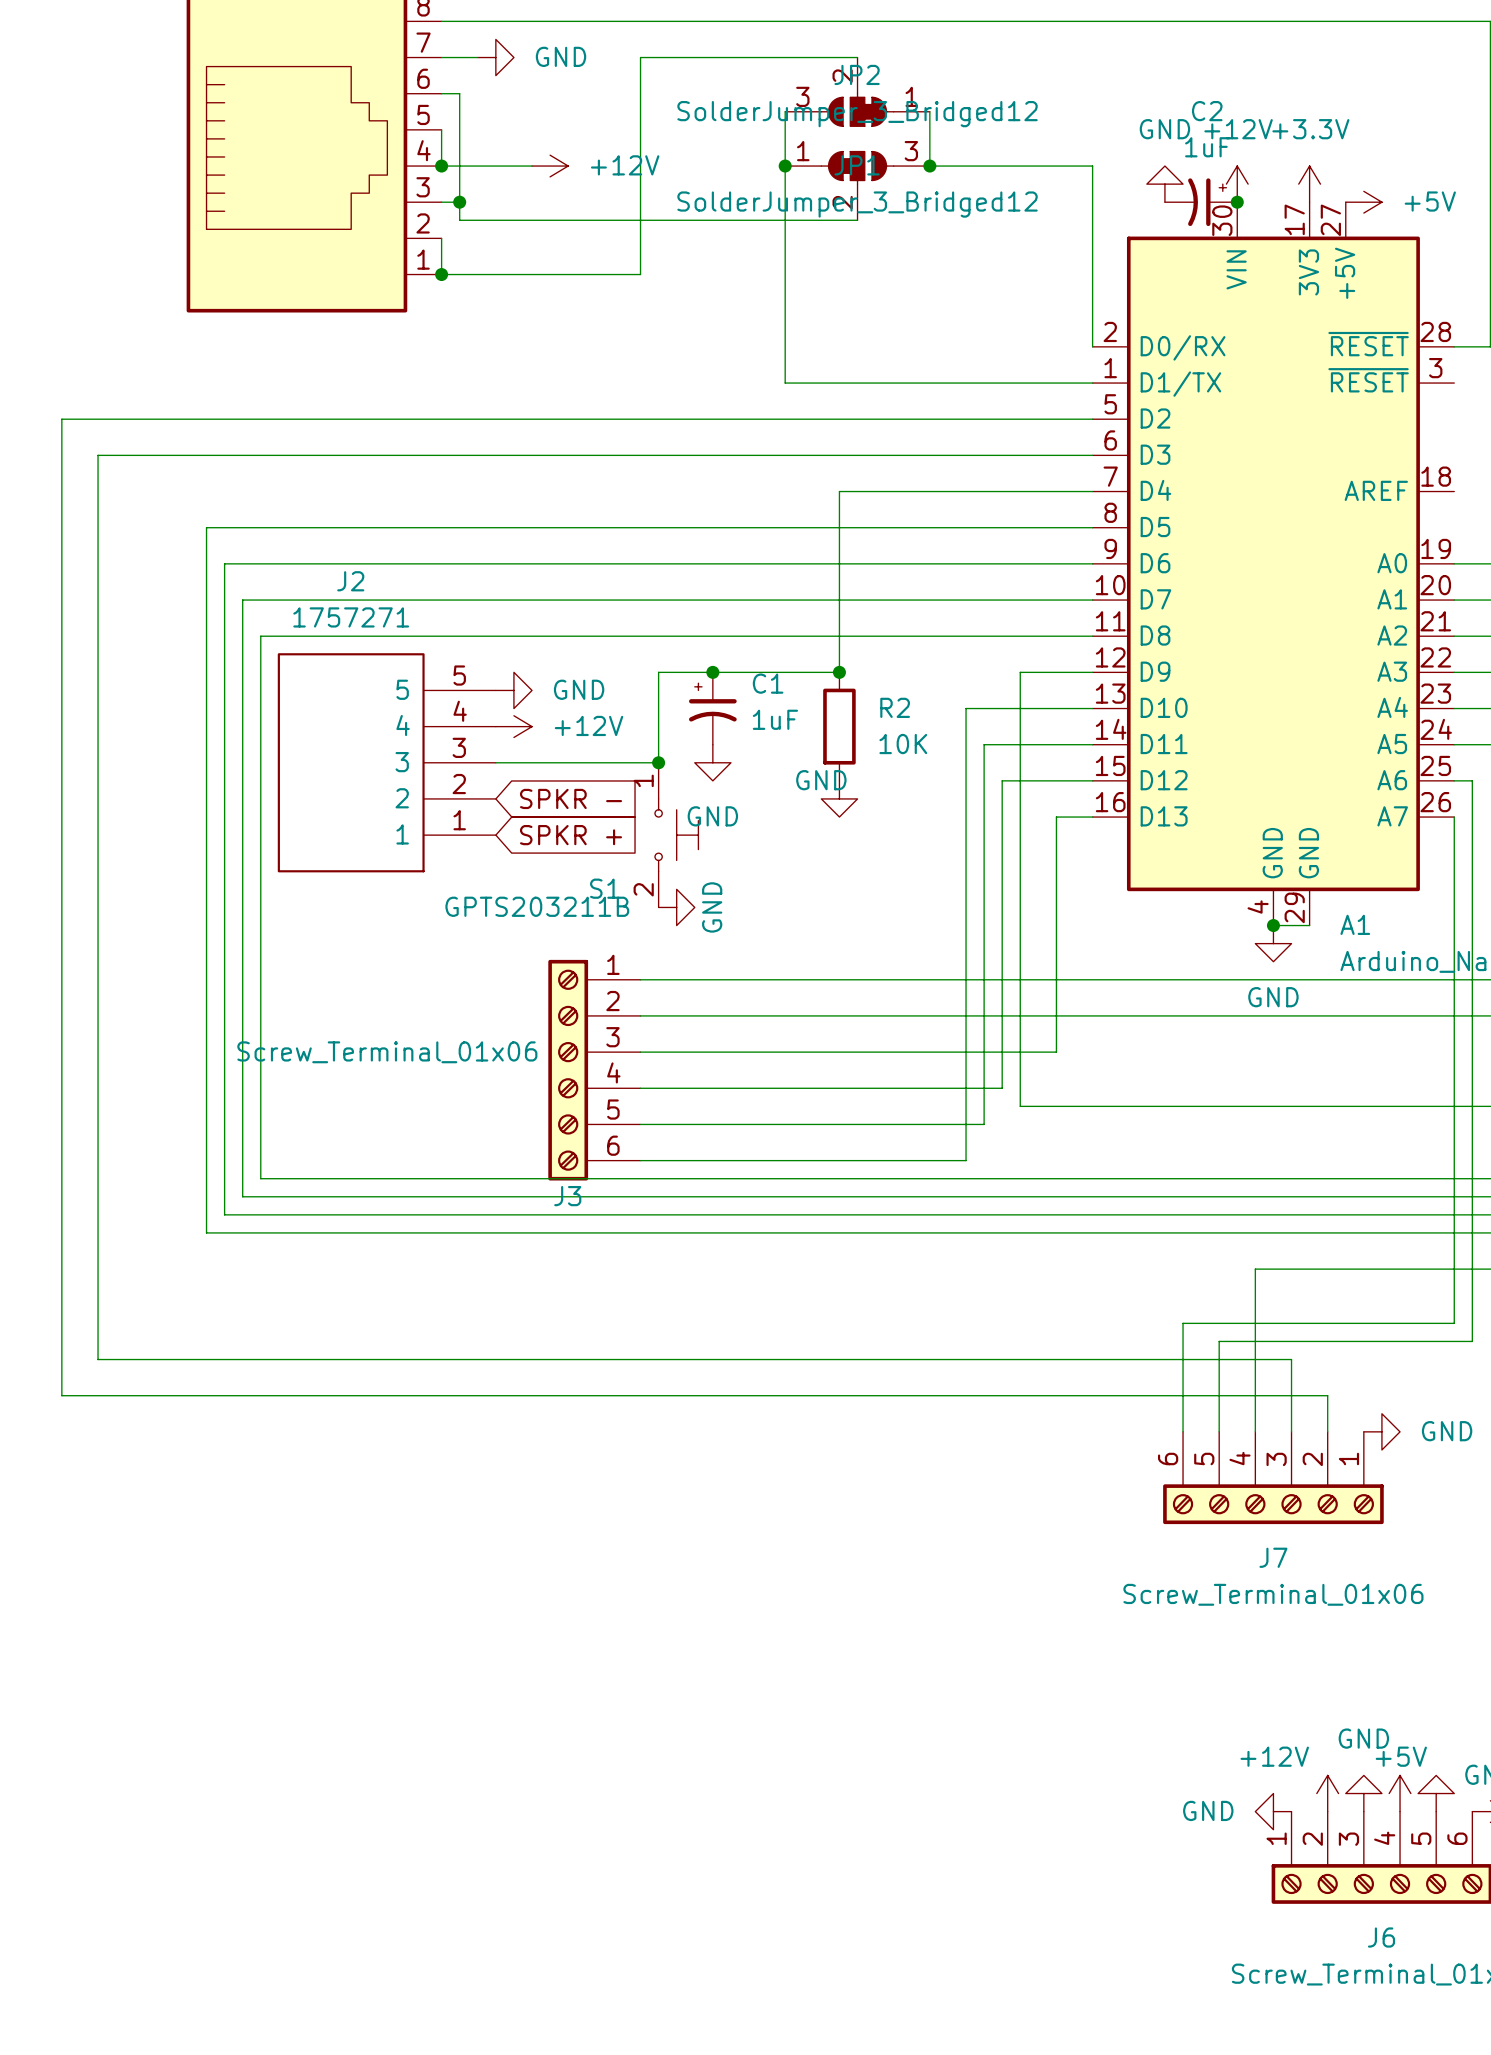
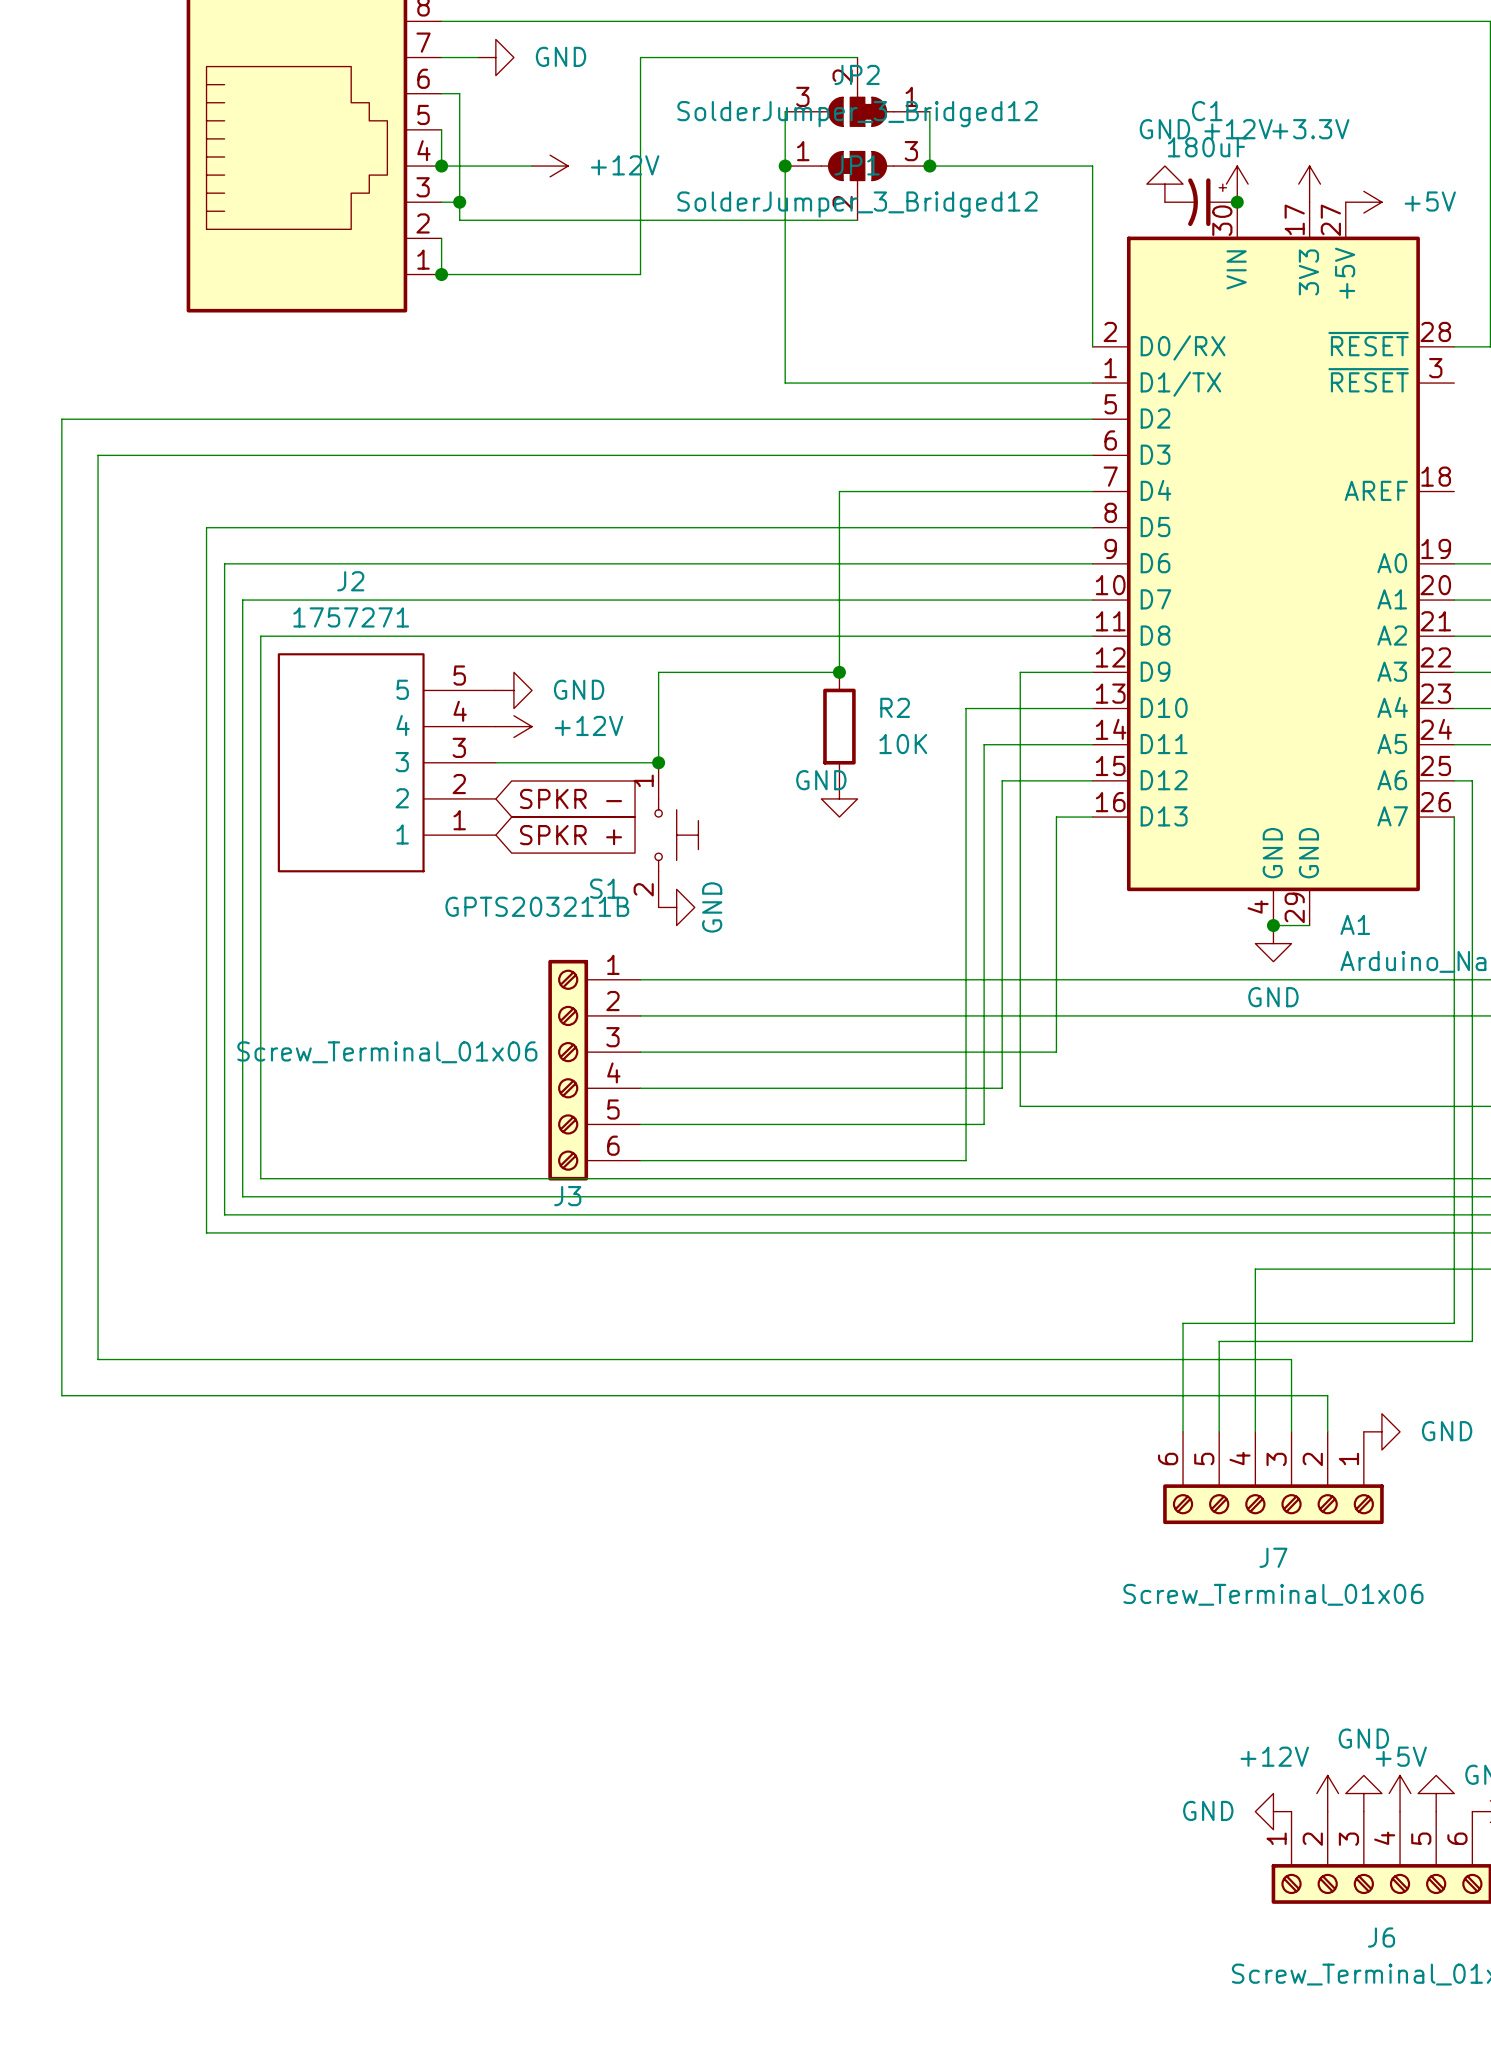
C2 name: C2 (1207, 111) -> C1 (1207, 111)
C2 value: 1uF (1207, 147) -> 180uF (1207, 147)
junction: (712, 672) -> none
C1: 1uF (712, 708) -> none
power symbol: GND (712, 762) -> none

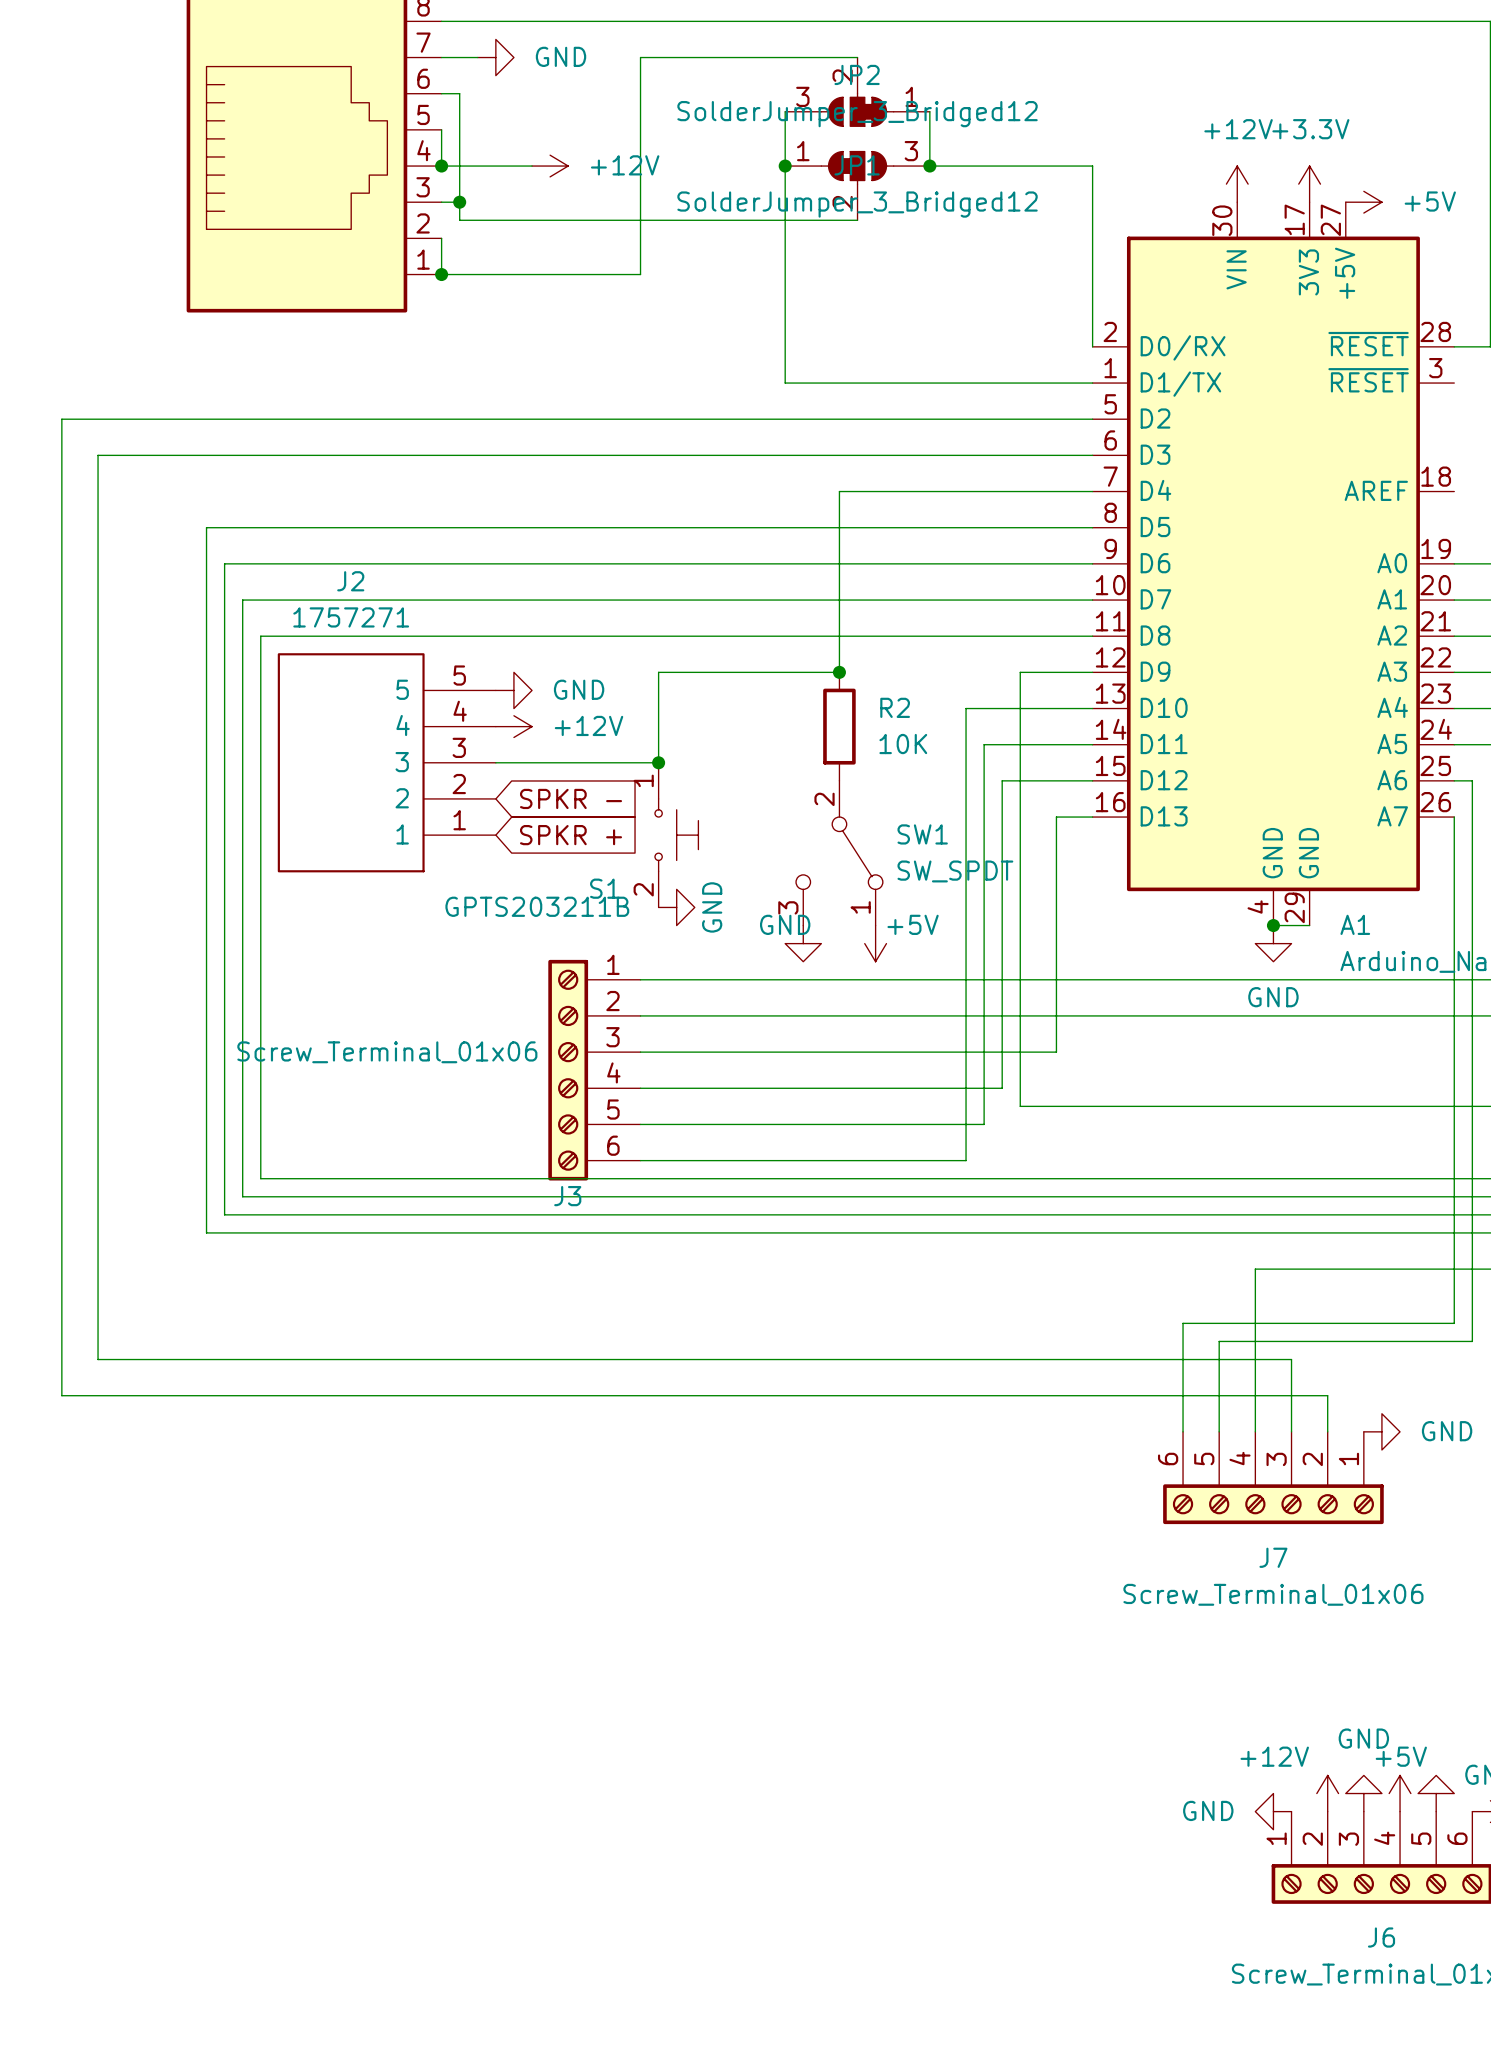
power symbol: GND (1164, 184) -> none
C1: 180uF (1201, 202) -> none
junction: (1237, 202) -> none
power symbol position: GND (839, 798) -> GND (803, 943)
SW1: none -> SW_SPDT (839, 853)
power symbol: none -> +5V (875, 943)

